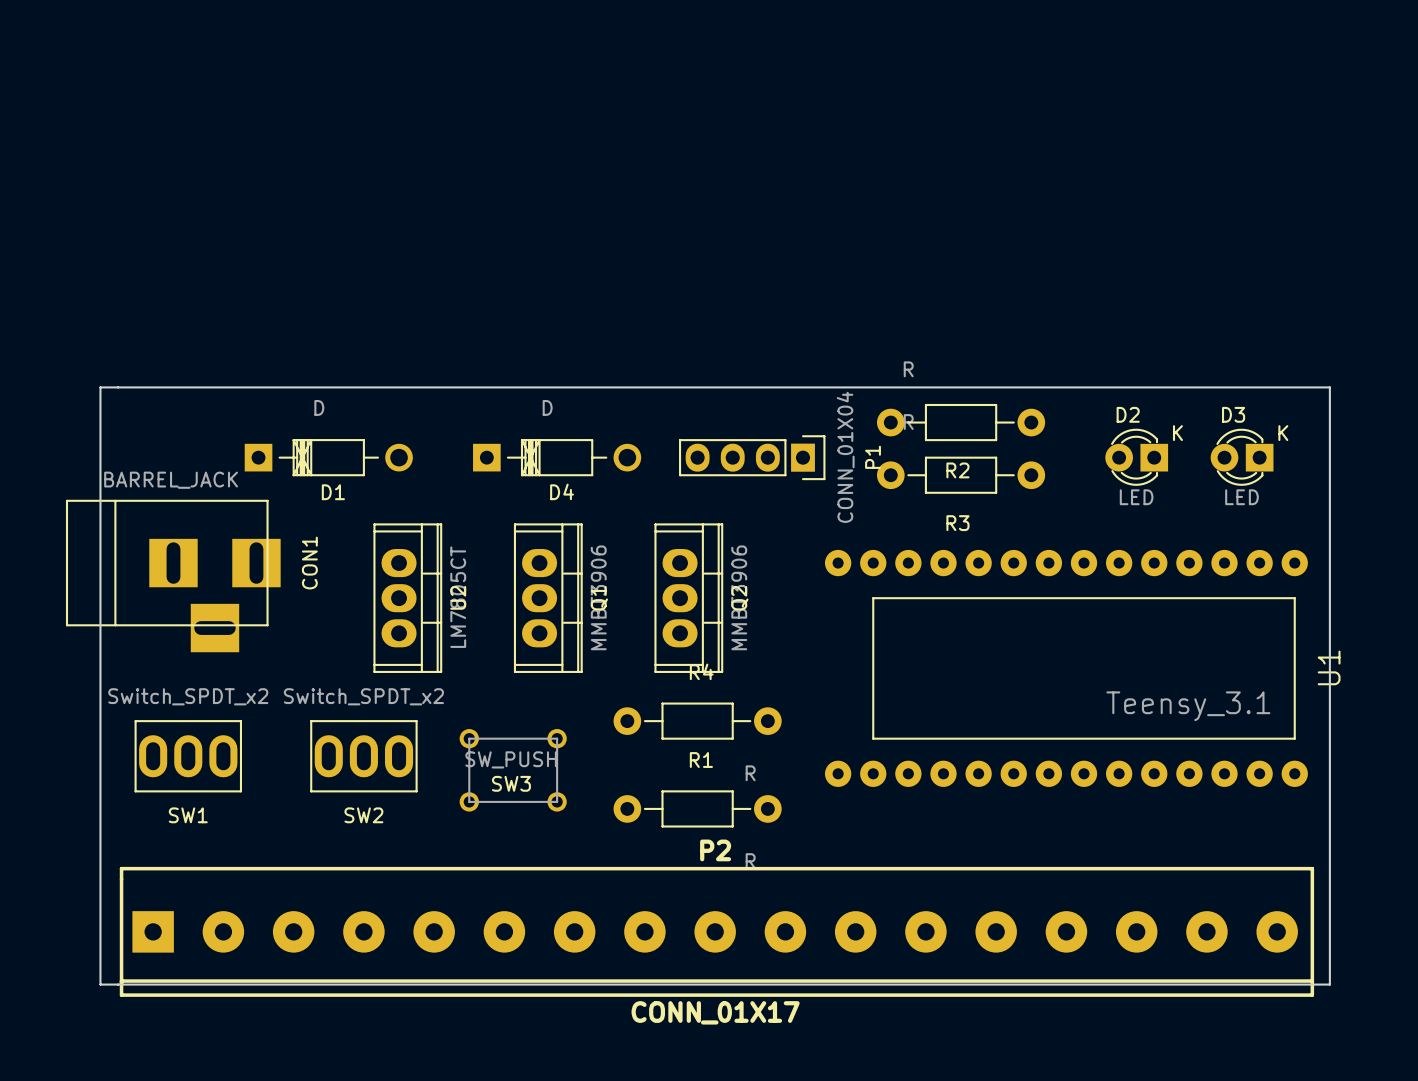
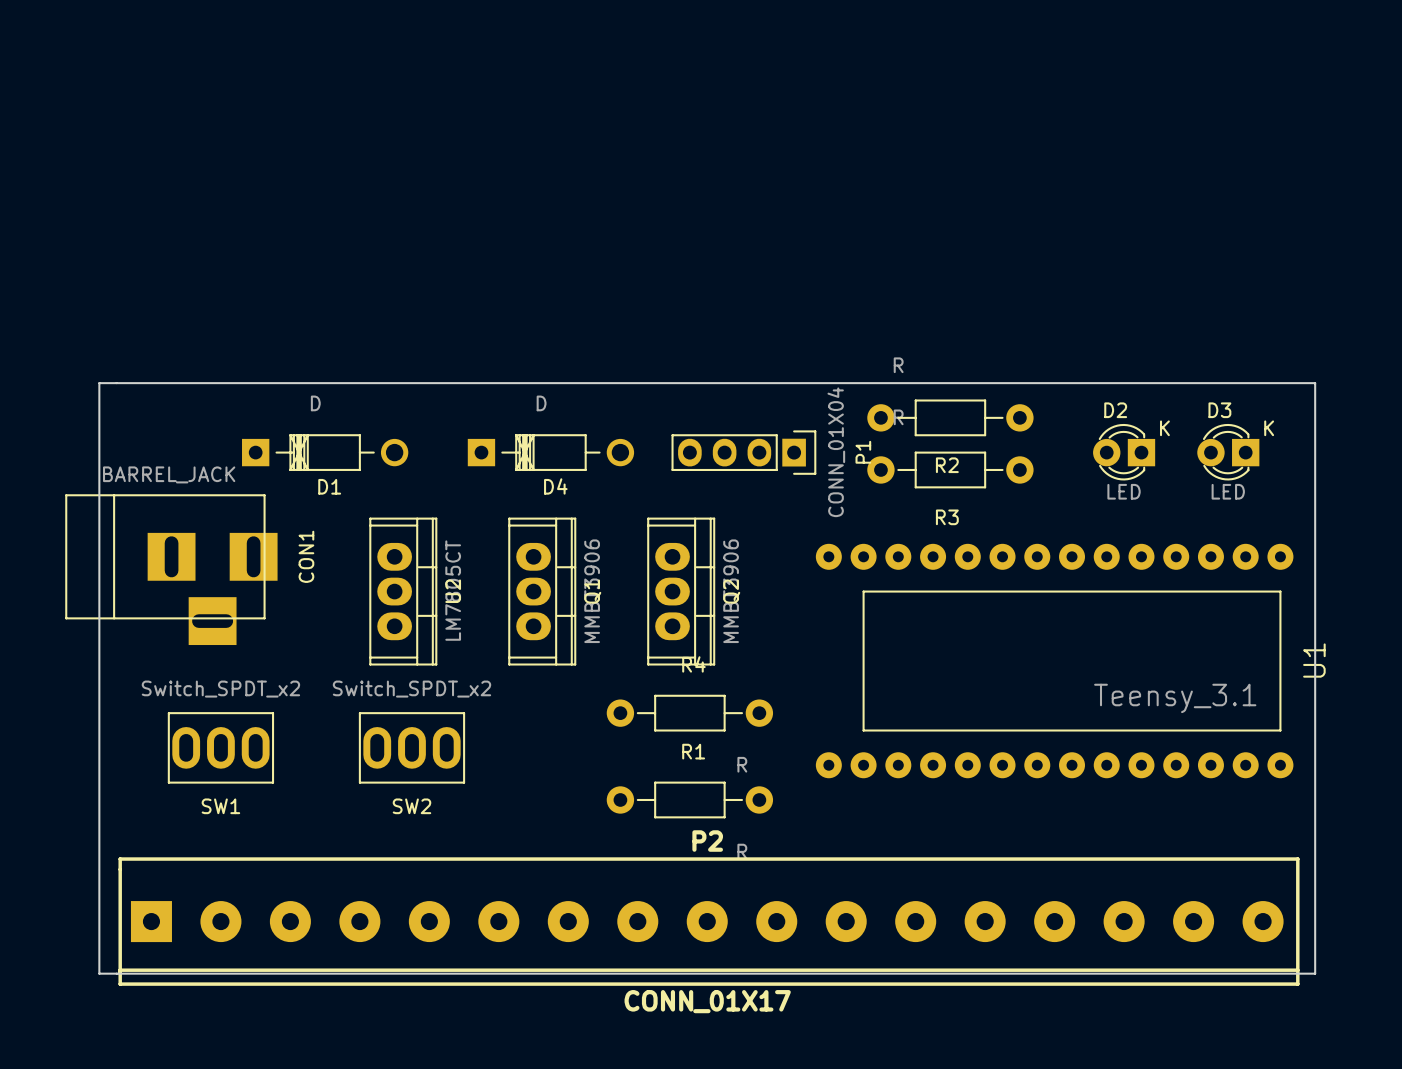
SW1 position: (188, 756) -> (220, 747)
SW2 position: (363, 756) -> (411, 747)
SW3: SW_PUSH (513, 770) -> none

